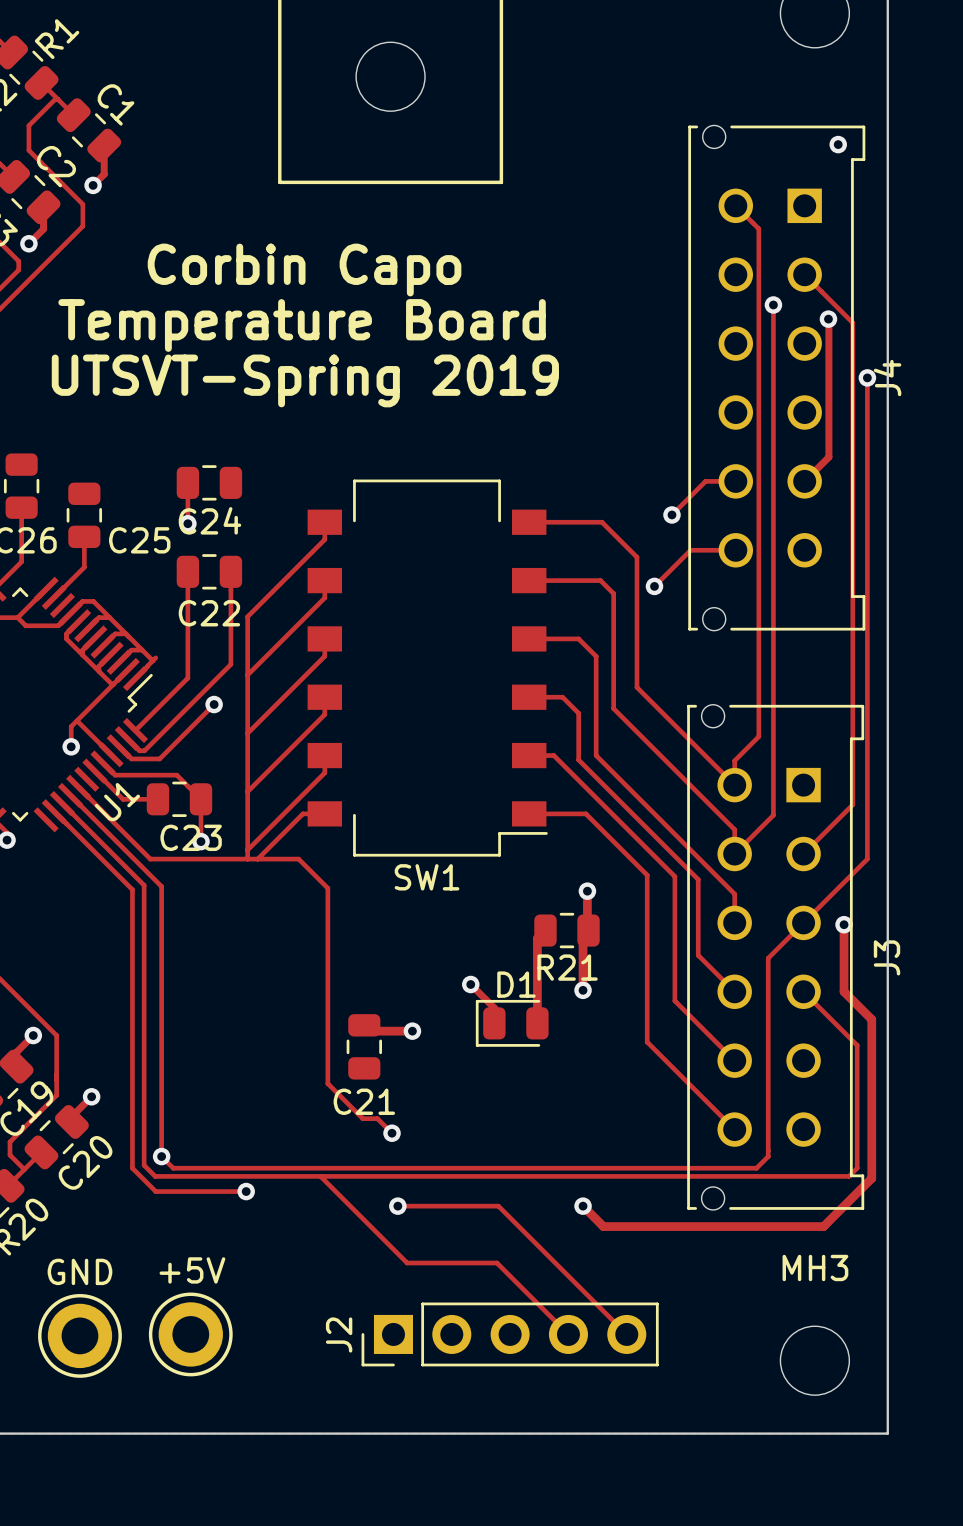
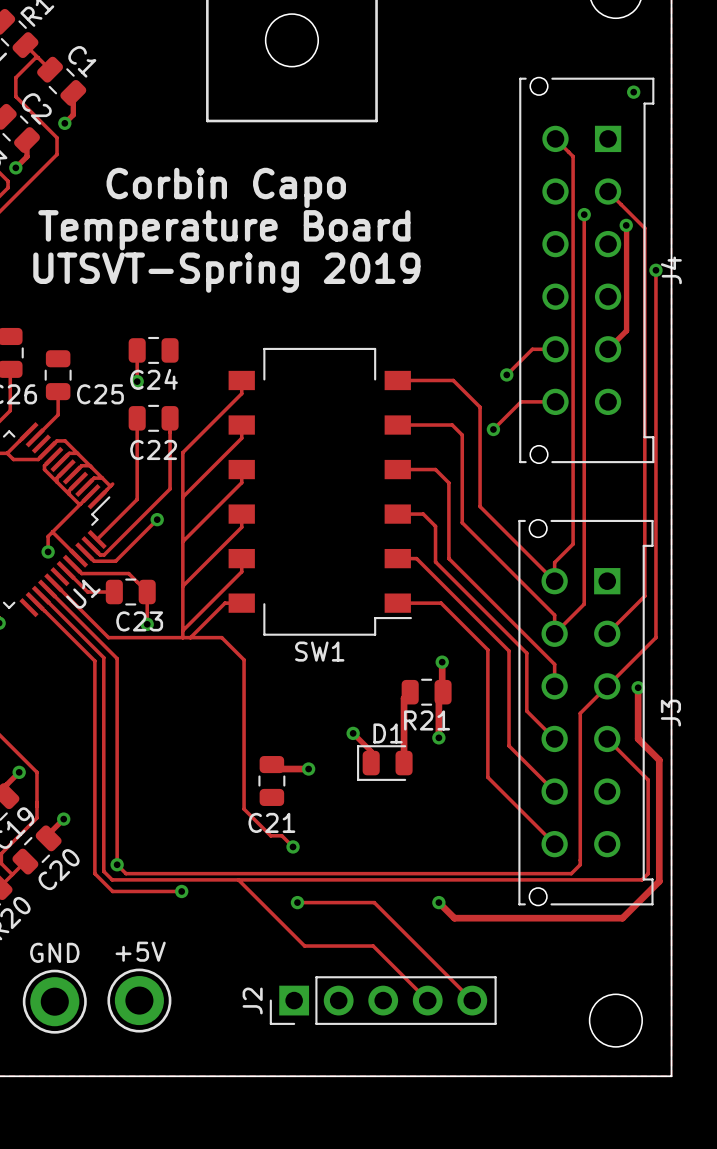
MH3 name: MH3 (815, 1267) -> none

